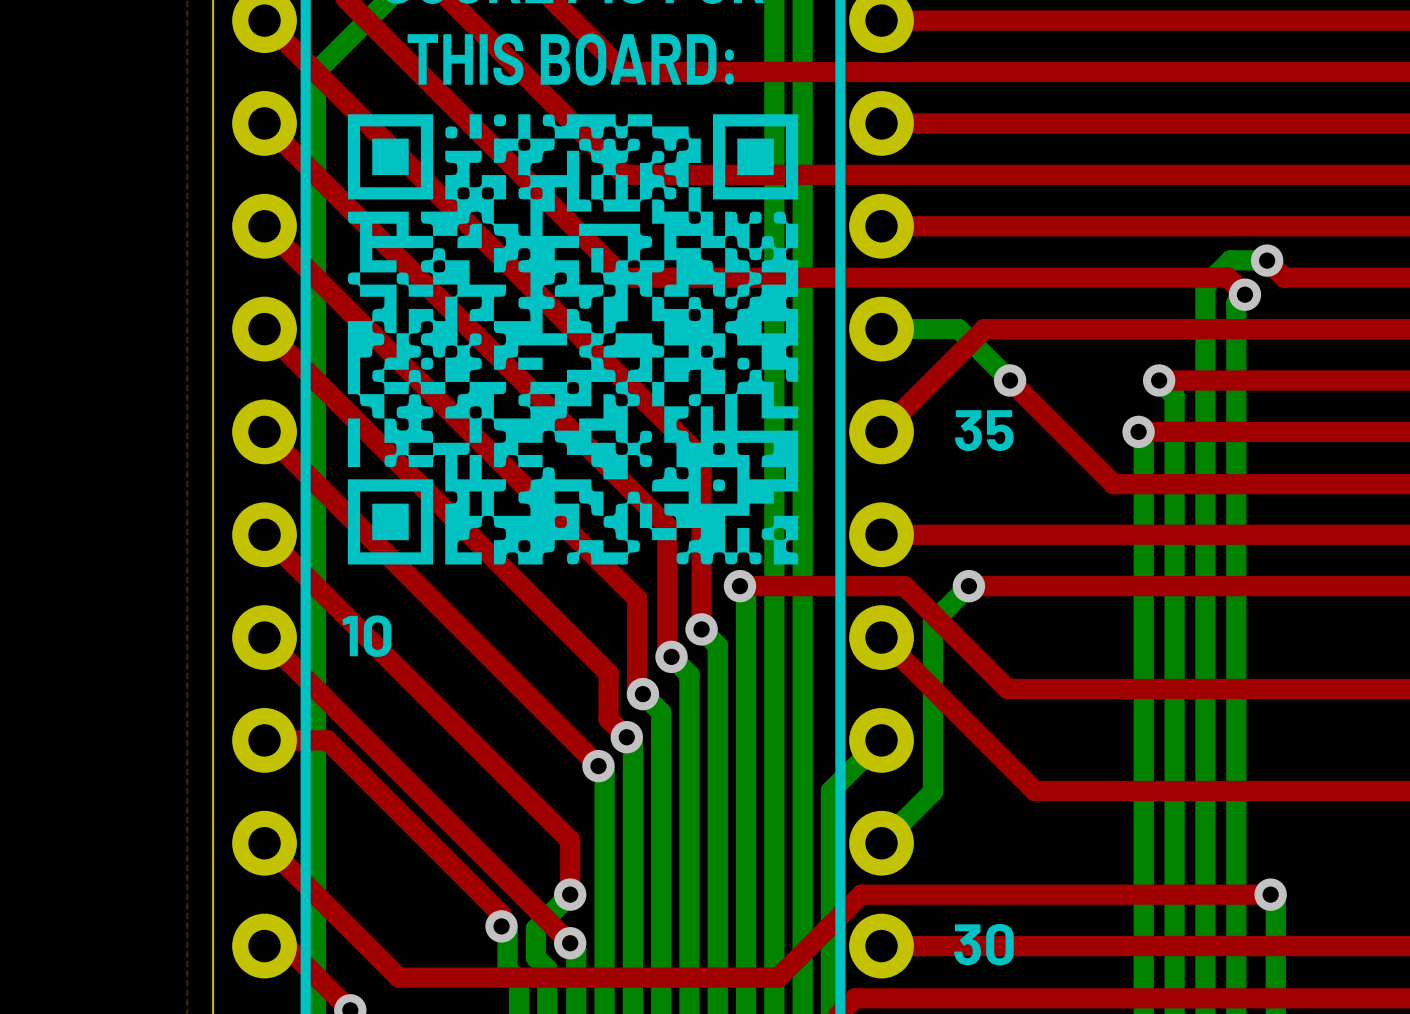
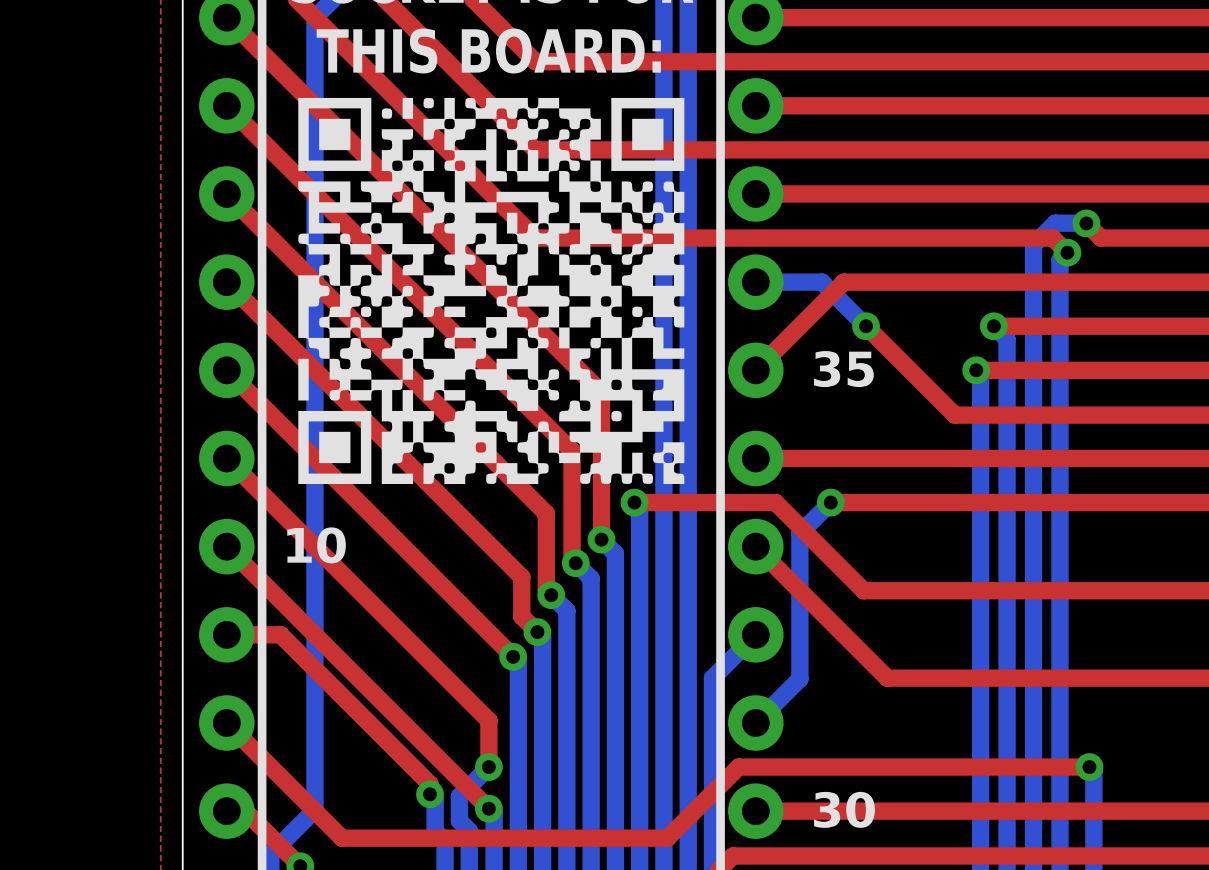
bottom track: (367, 20) (315, 72) (315, 996) -> (314, 17) (314, 809) (270, 854)

